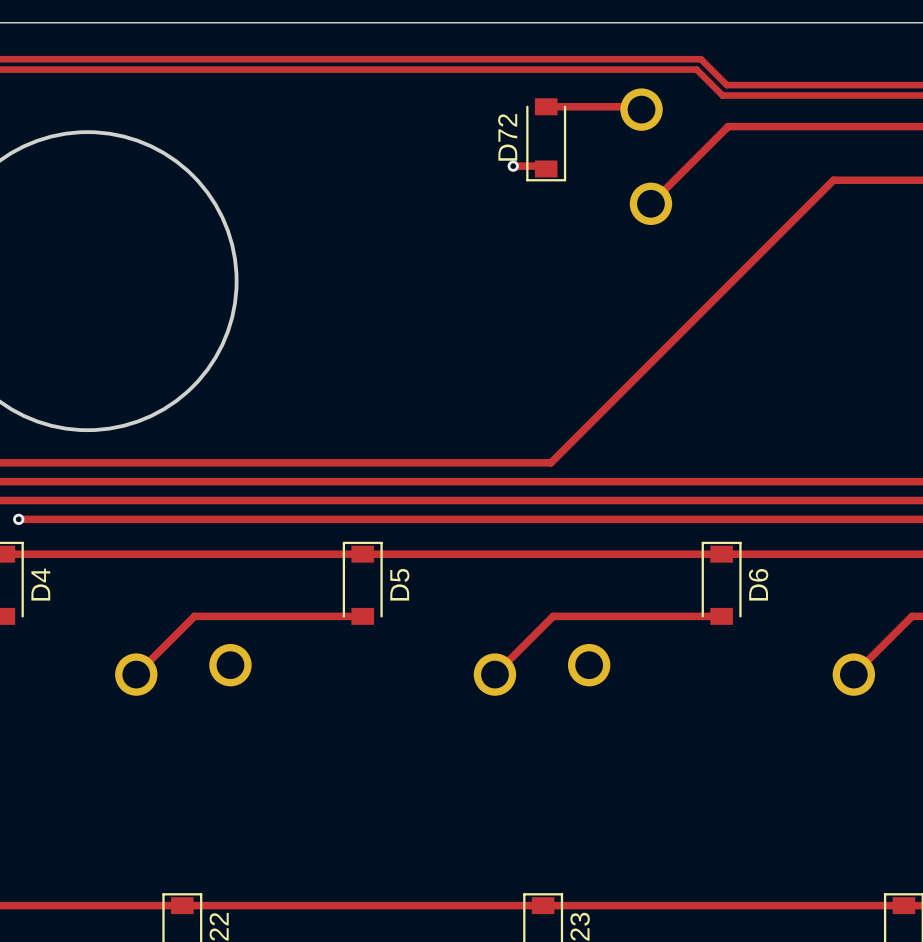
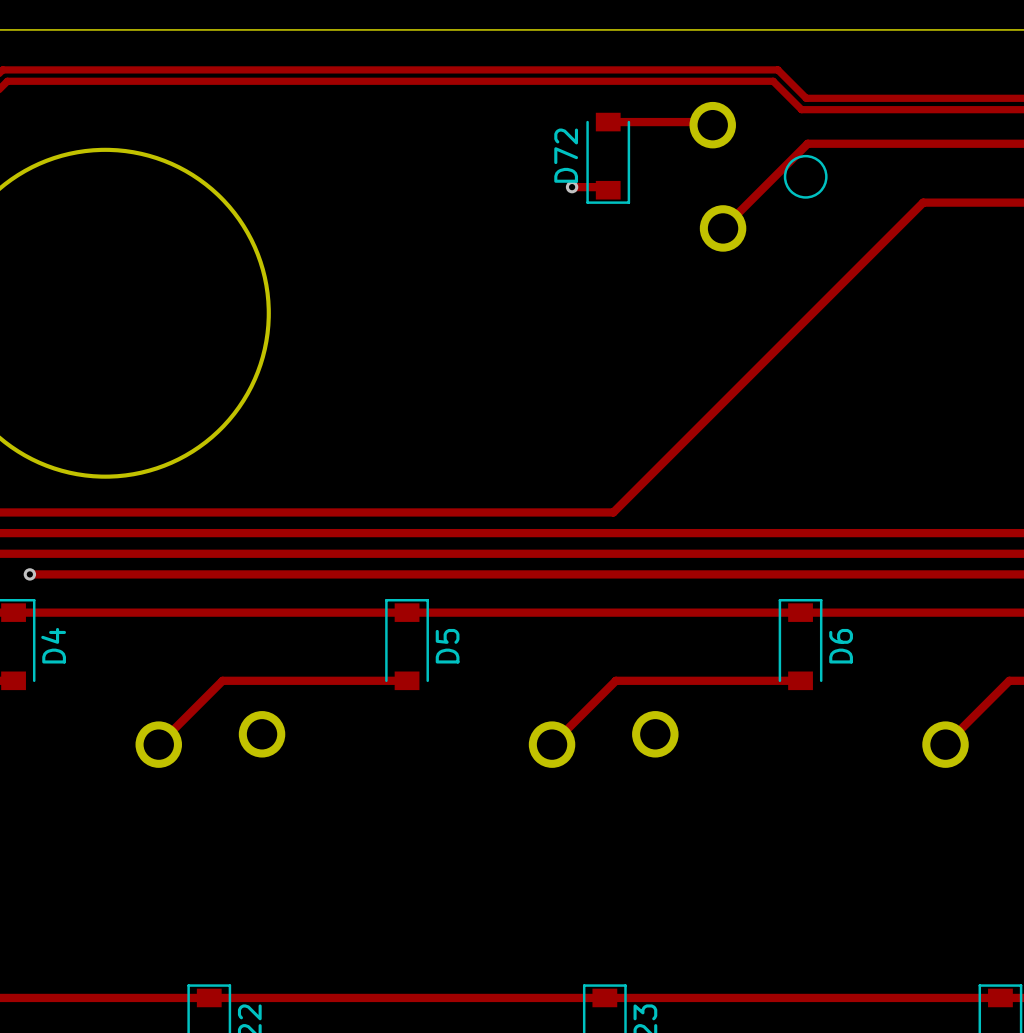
drawing: none -> [783, 154, 828, 199]

